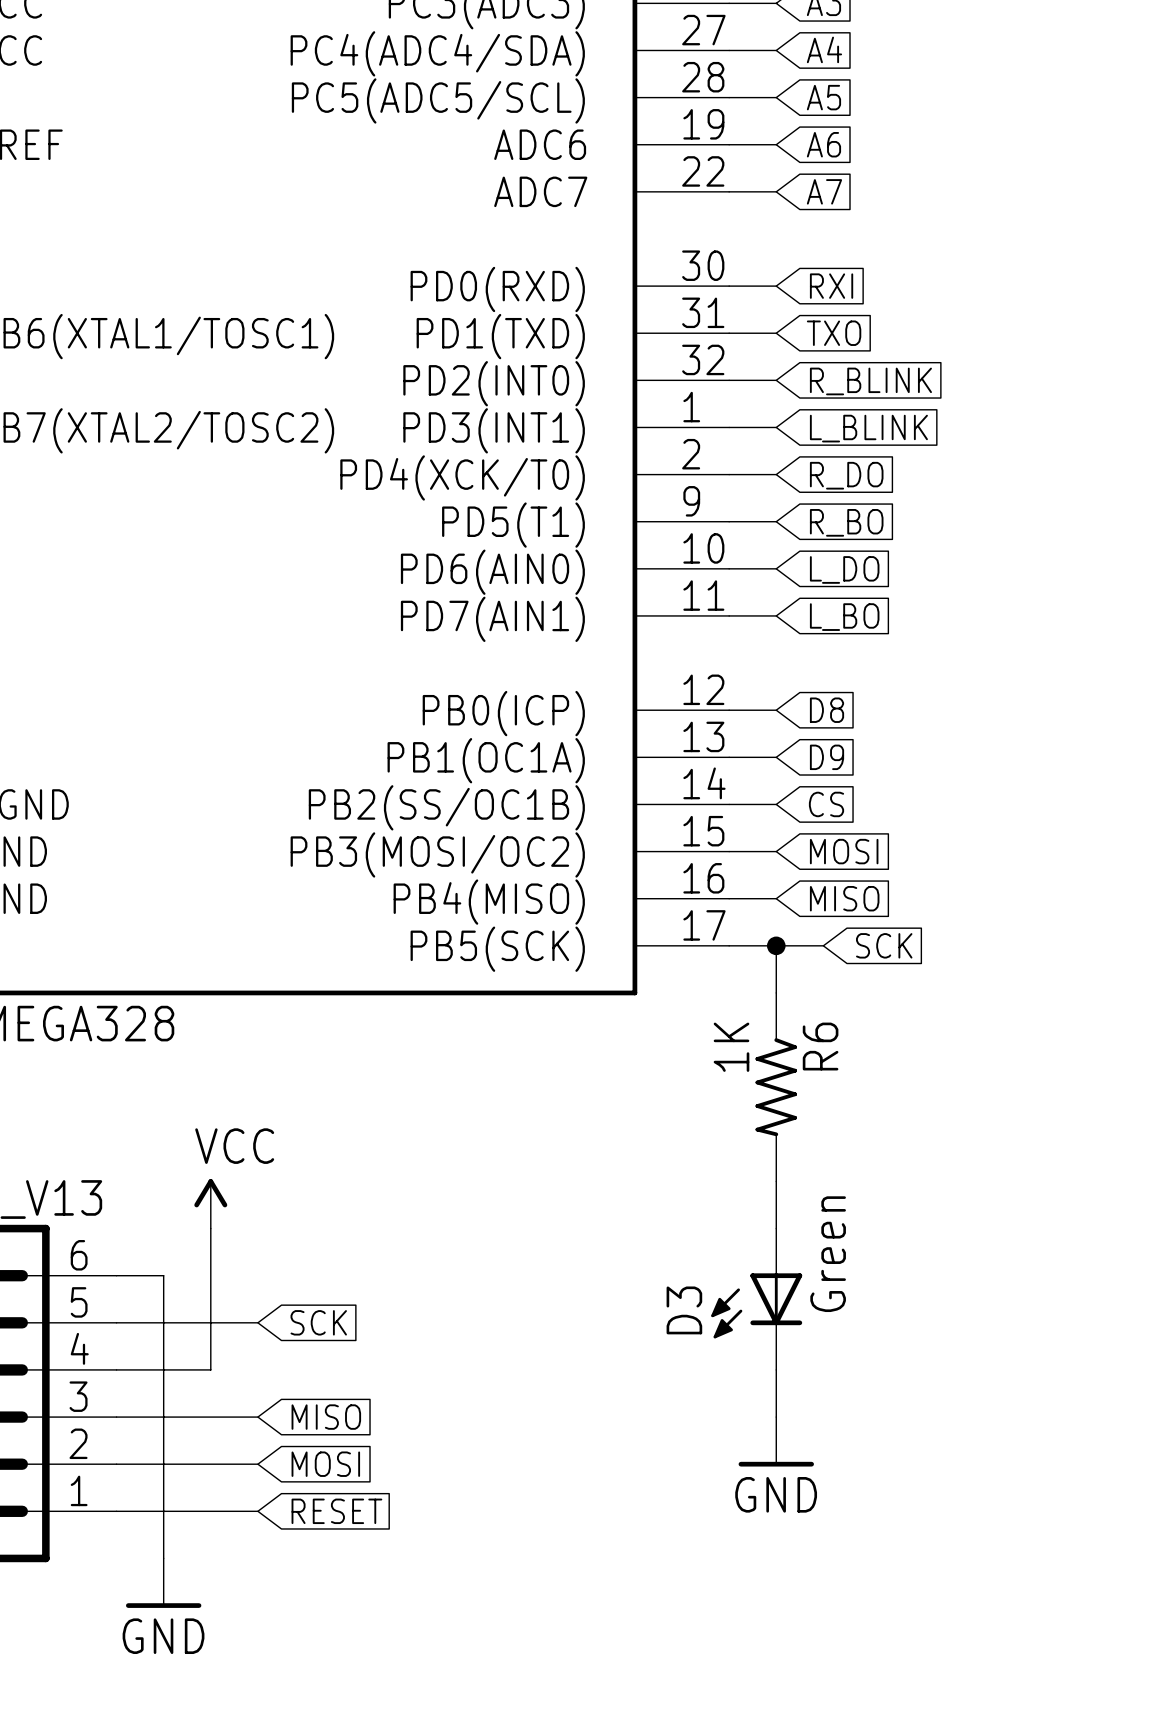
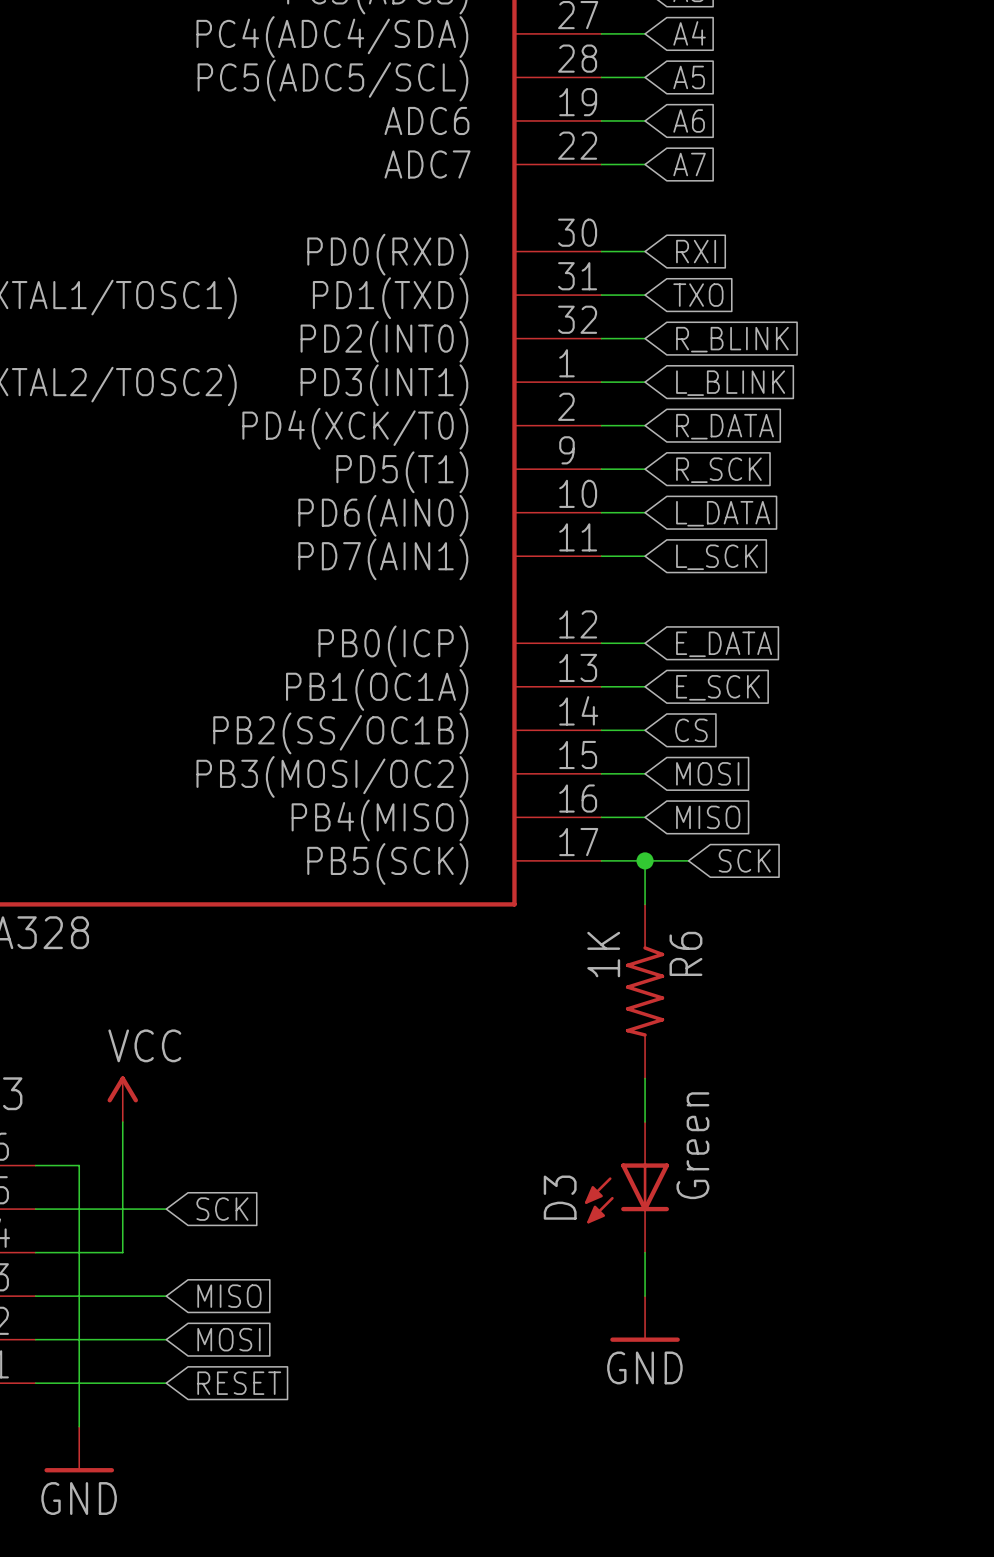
global label: R_DO (846, 475) -> R_DATA (725, 426)
global label: R_BO (846, 522) -> R_SCK (718, 470)
global label: L_DO (844, 569) -> L_DATA (723, 513)
global label: L_BO (844, 617) -> L_SCK (717, 557)
global label: D8 (827, 710) -> E_DATA (724, 644)
global label: D9 (827, 757) -> E_SCK (718, 687)

